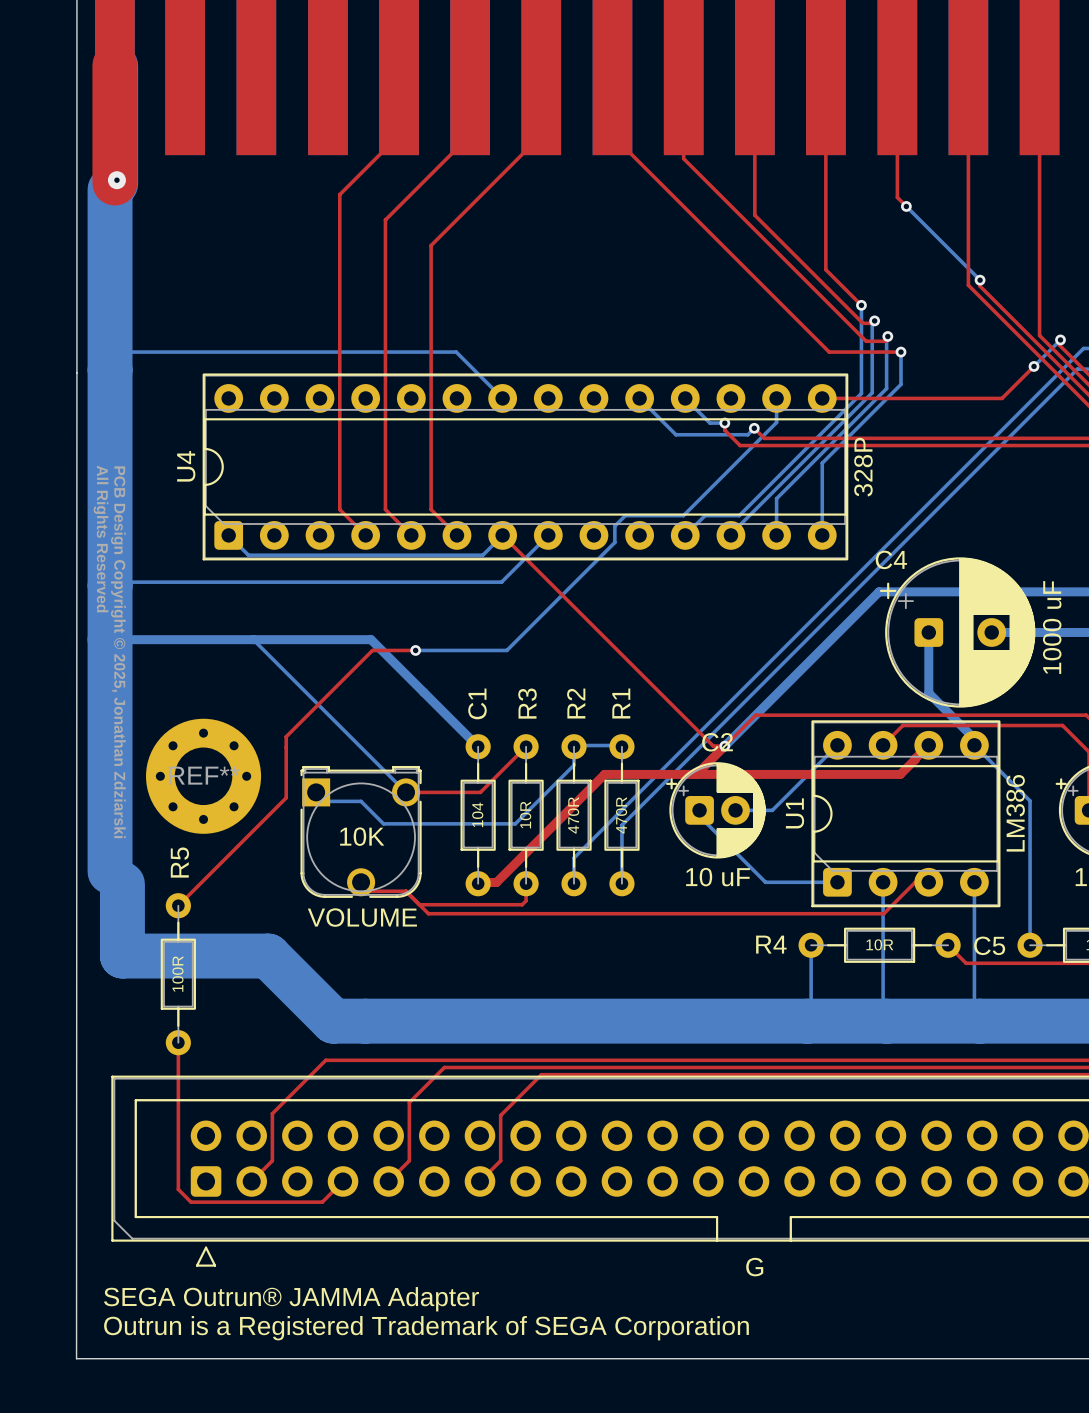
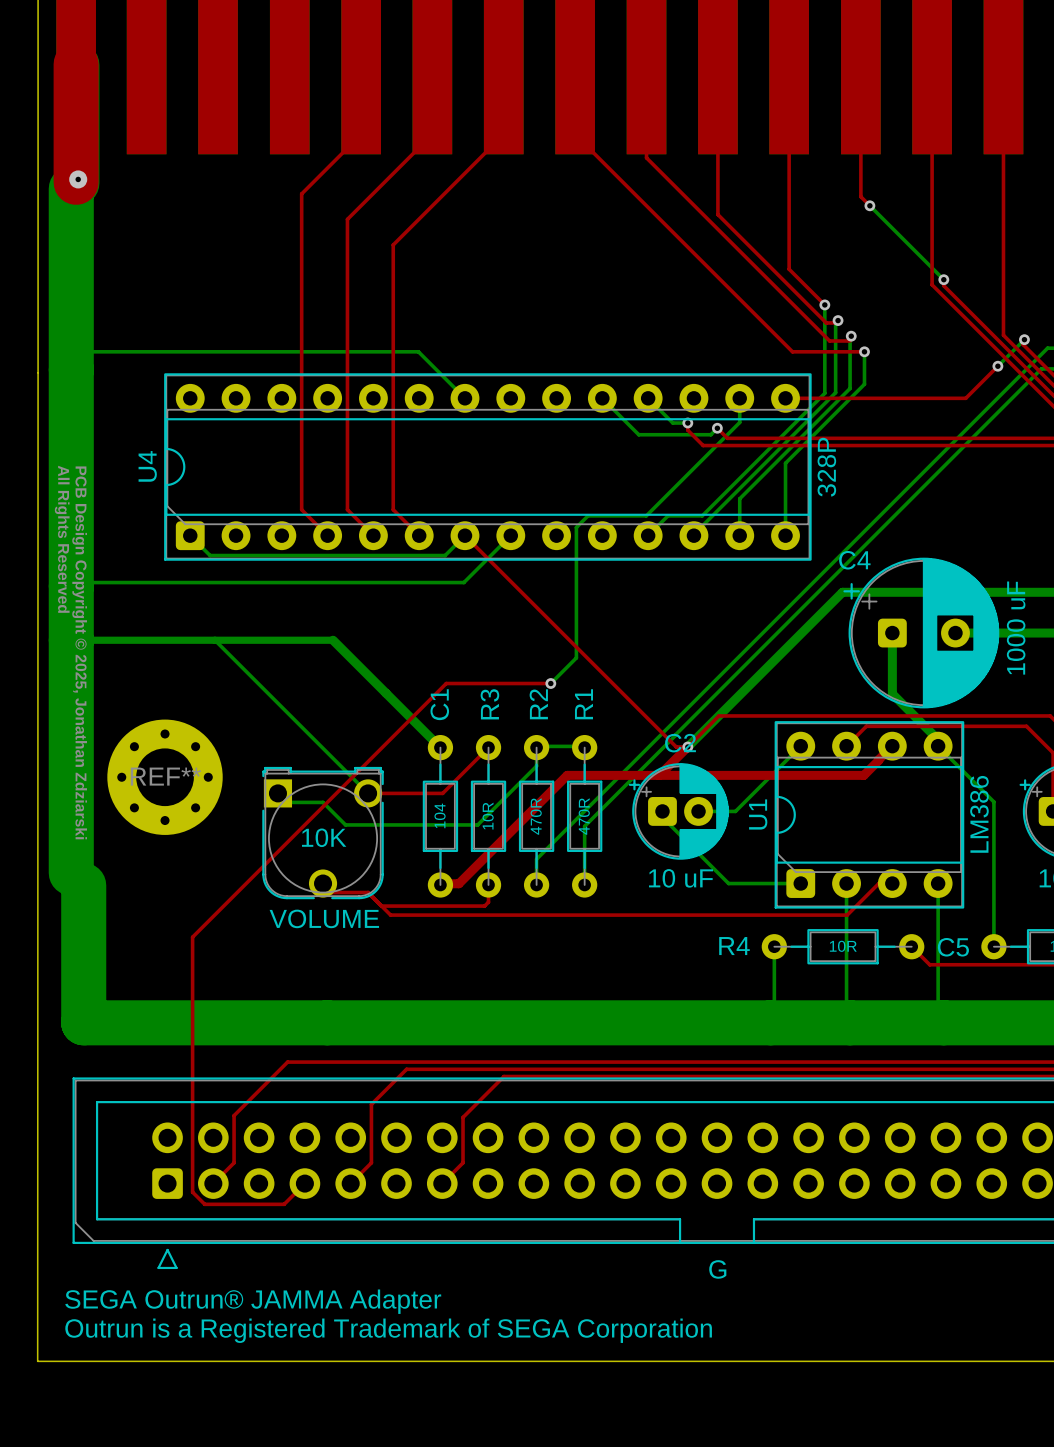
bottom track: (614, 526) (614, 542) (506, 650) (412, 650) -> (577, 526) (576, 657) (550, 683)
bottom track width: thick (110, 639) (371, 639) -> thin (71, 640) (333, 640)
top track: (415, 650) (372, 650) (286, 736) (286, 797) (178, 905) -> none
via: (415, 650) -> none
via: none -> (550, 683)
bottom track: (122, 956) (268, 956) (333, 1021) -> (83, 957) (83, 1022) (295, 1022)
R5: 100R (178, 974) -> none
top track: (178, 1038) (178, 1189) (191, 1202) (243, 1202) -> (550, 683) (446, 683) (192, 937) (192, 1192) (204, 1204)

